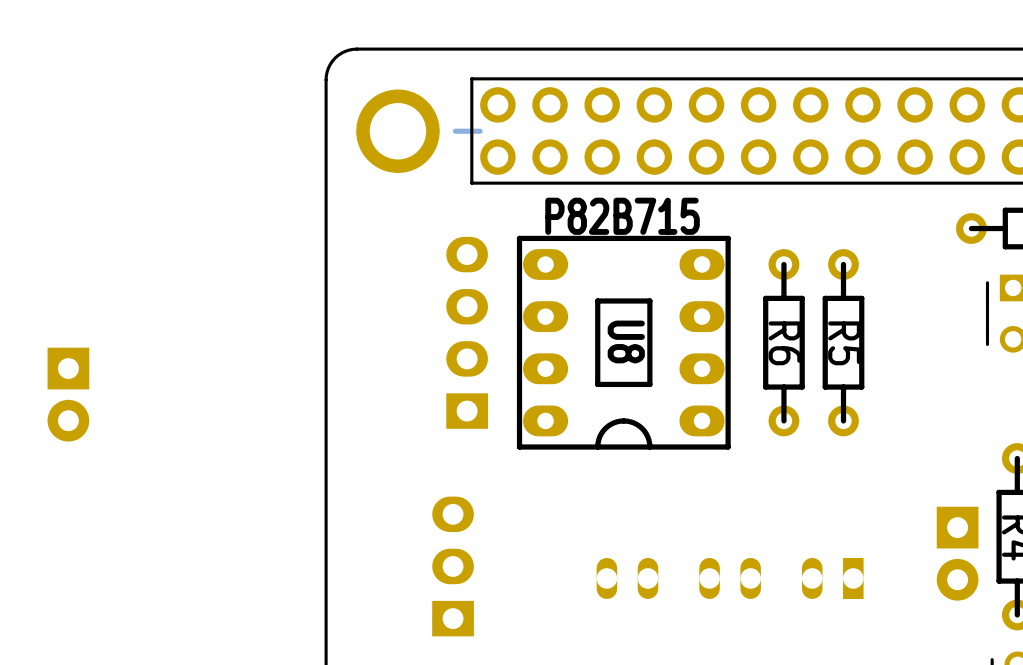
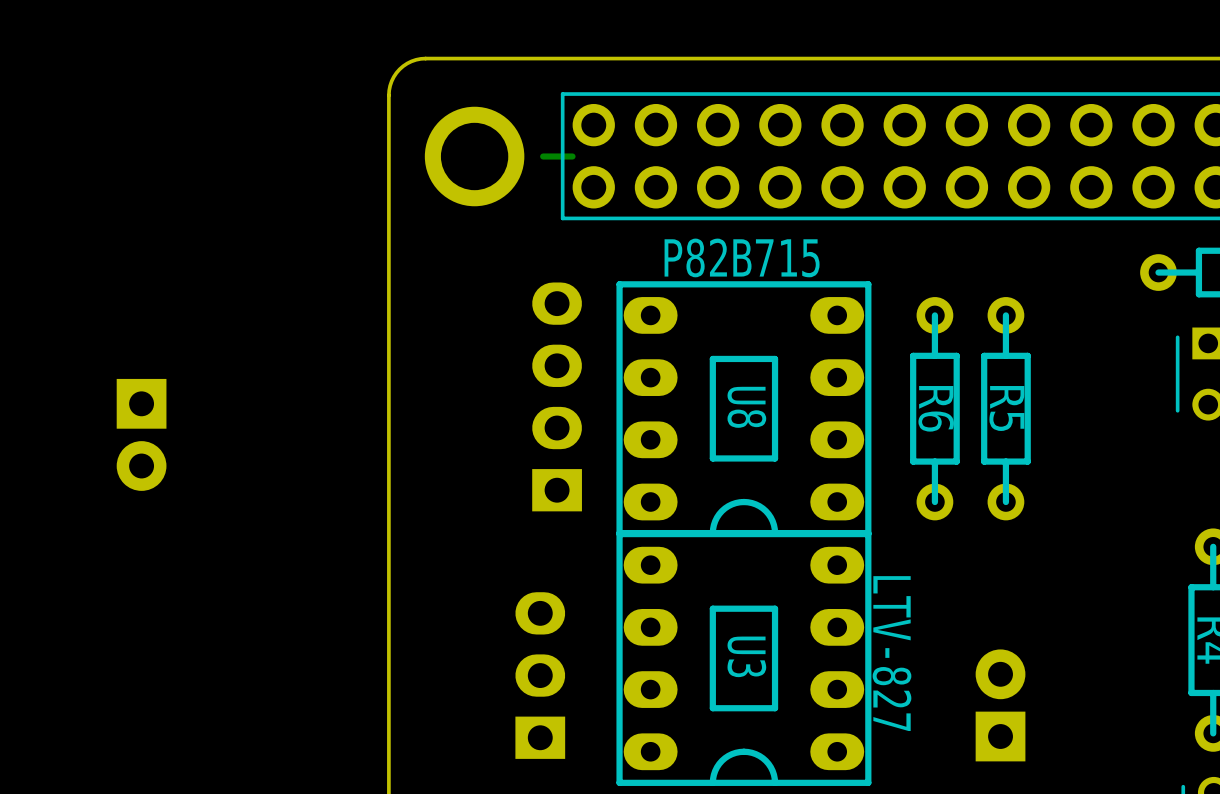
part position: (68, 394) -> (141, 434)
U3: none -> LTV-827 (743, 658)
part rotation: 0° (957, 553) -> 180° (1000, 705)
part position: (957, 553) -> (1000, 705)
part: (730, 578) -> none

